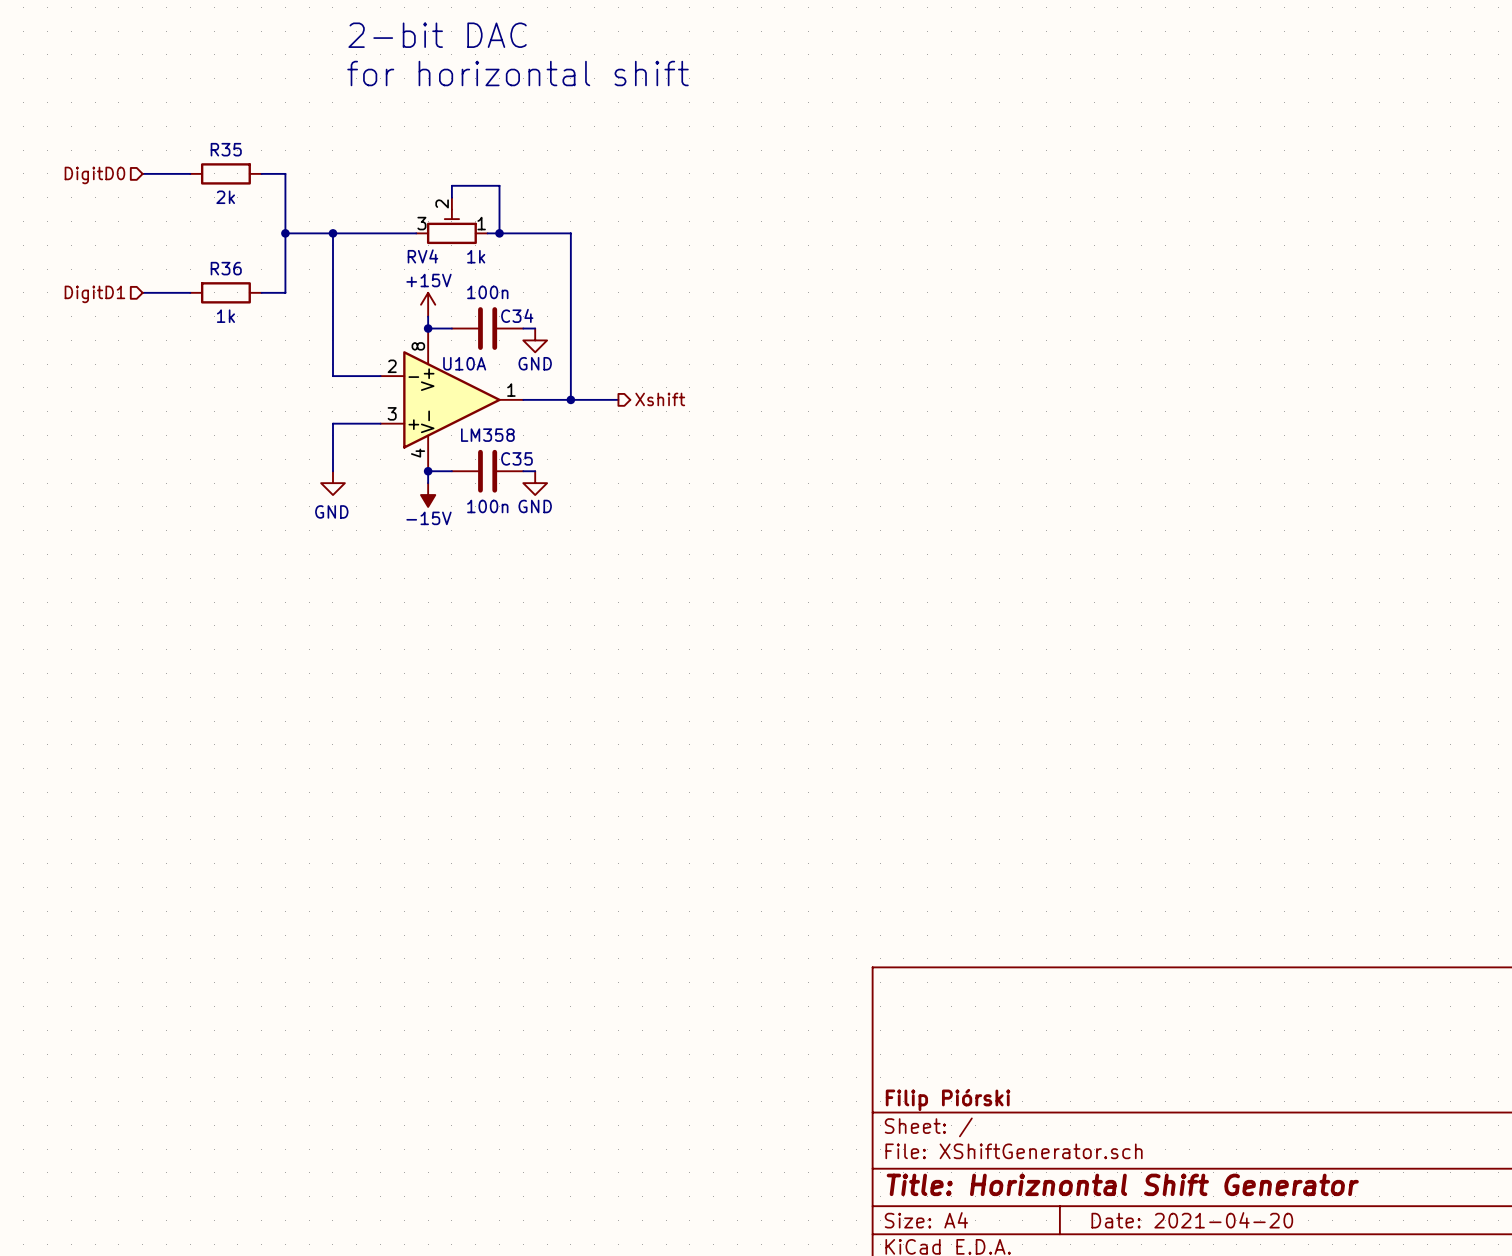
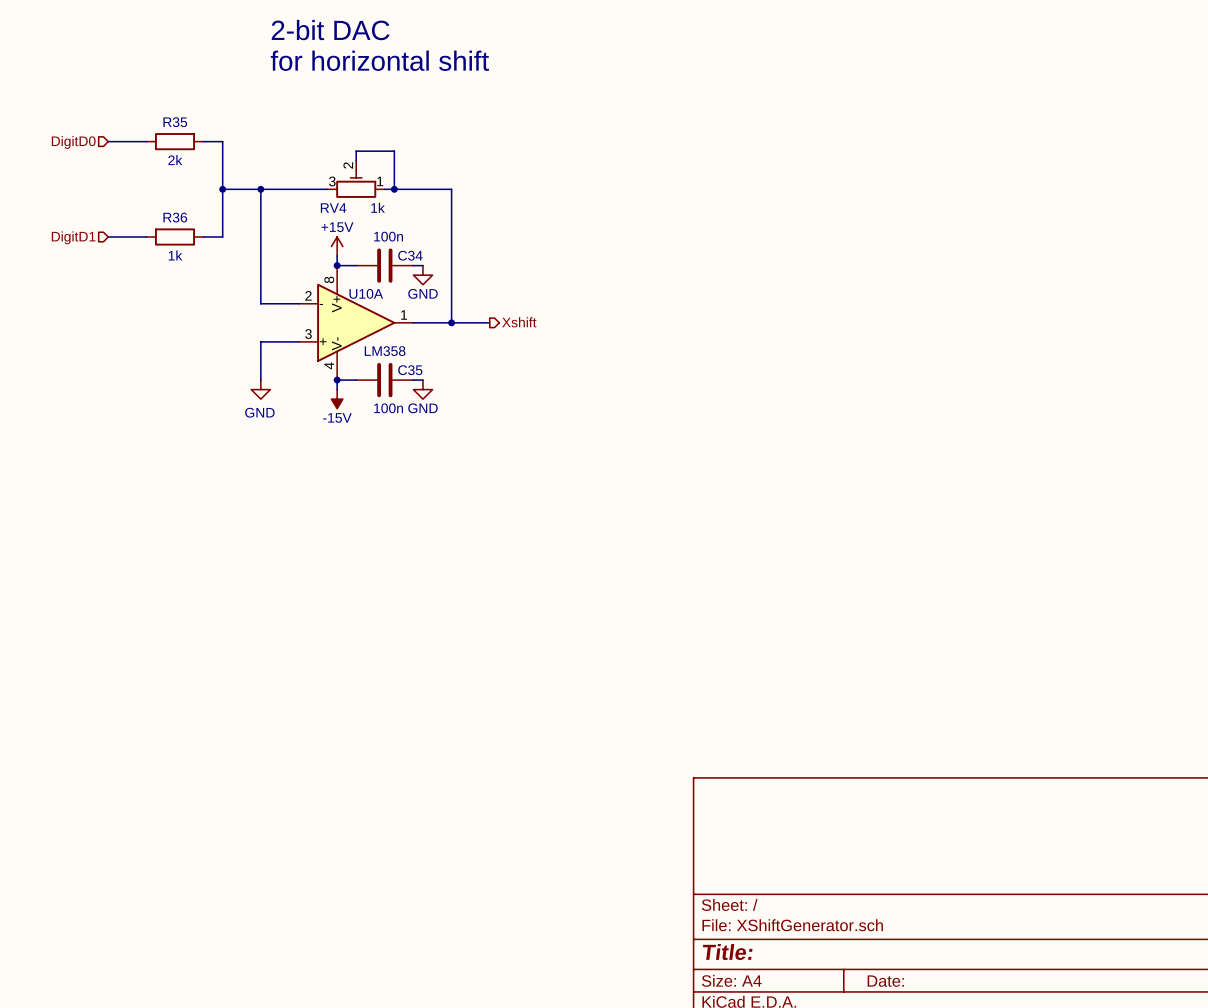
title block: Filip Piórski (948, 1099) -> none
title block: Title: Horiznontal Shift Generator (1122, 1184) -> Title: (727, 952)
title block: Date: 2021-04-20 (1192, 1220) -> Date: (885, 981)

